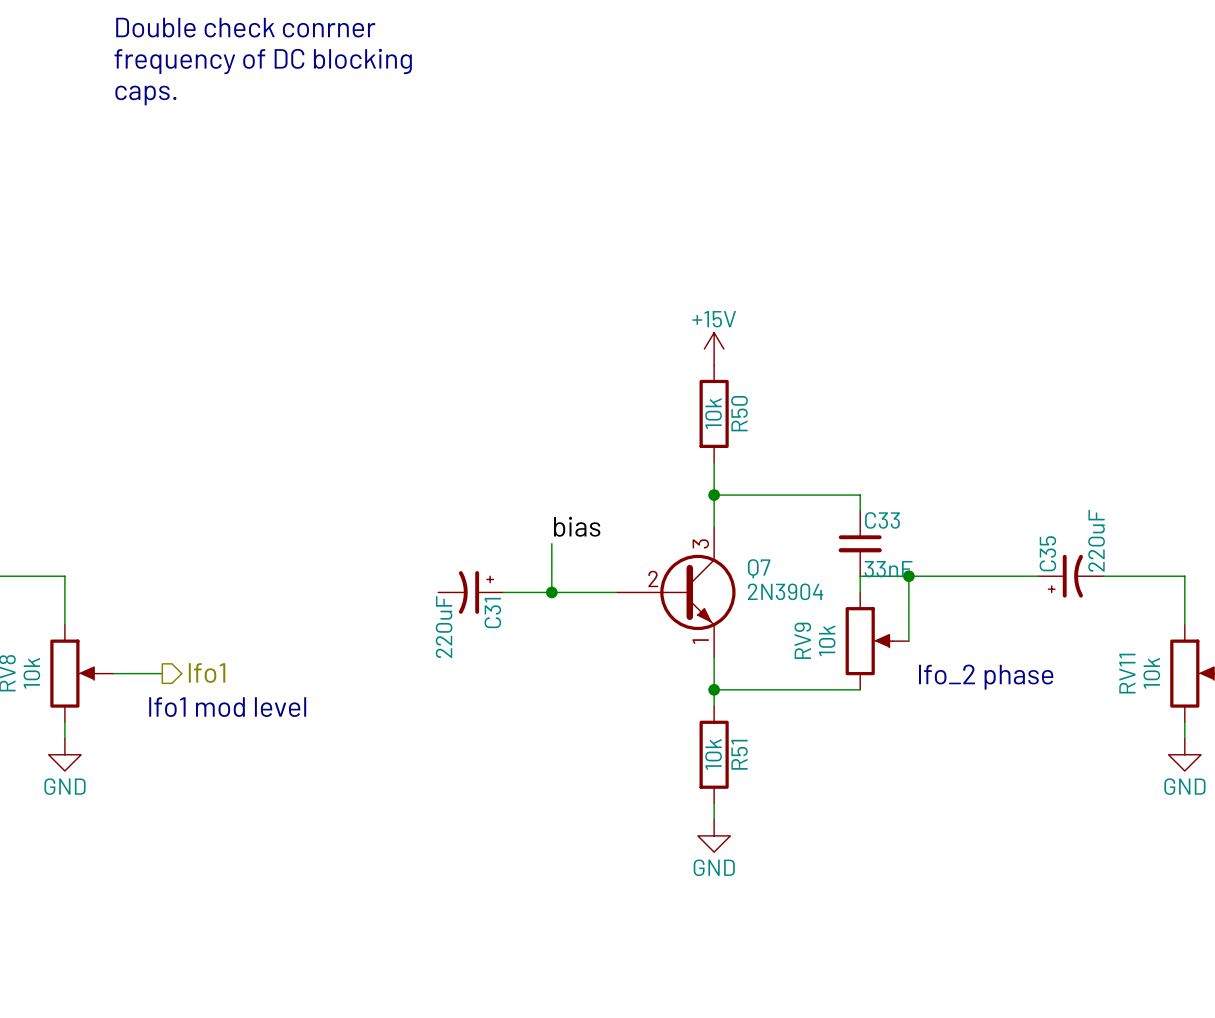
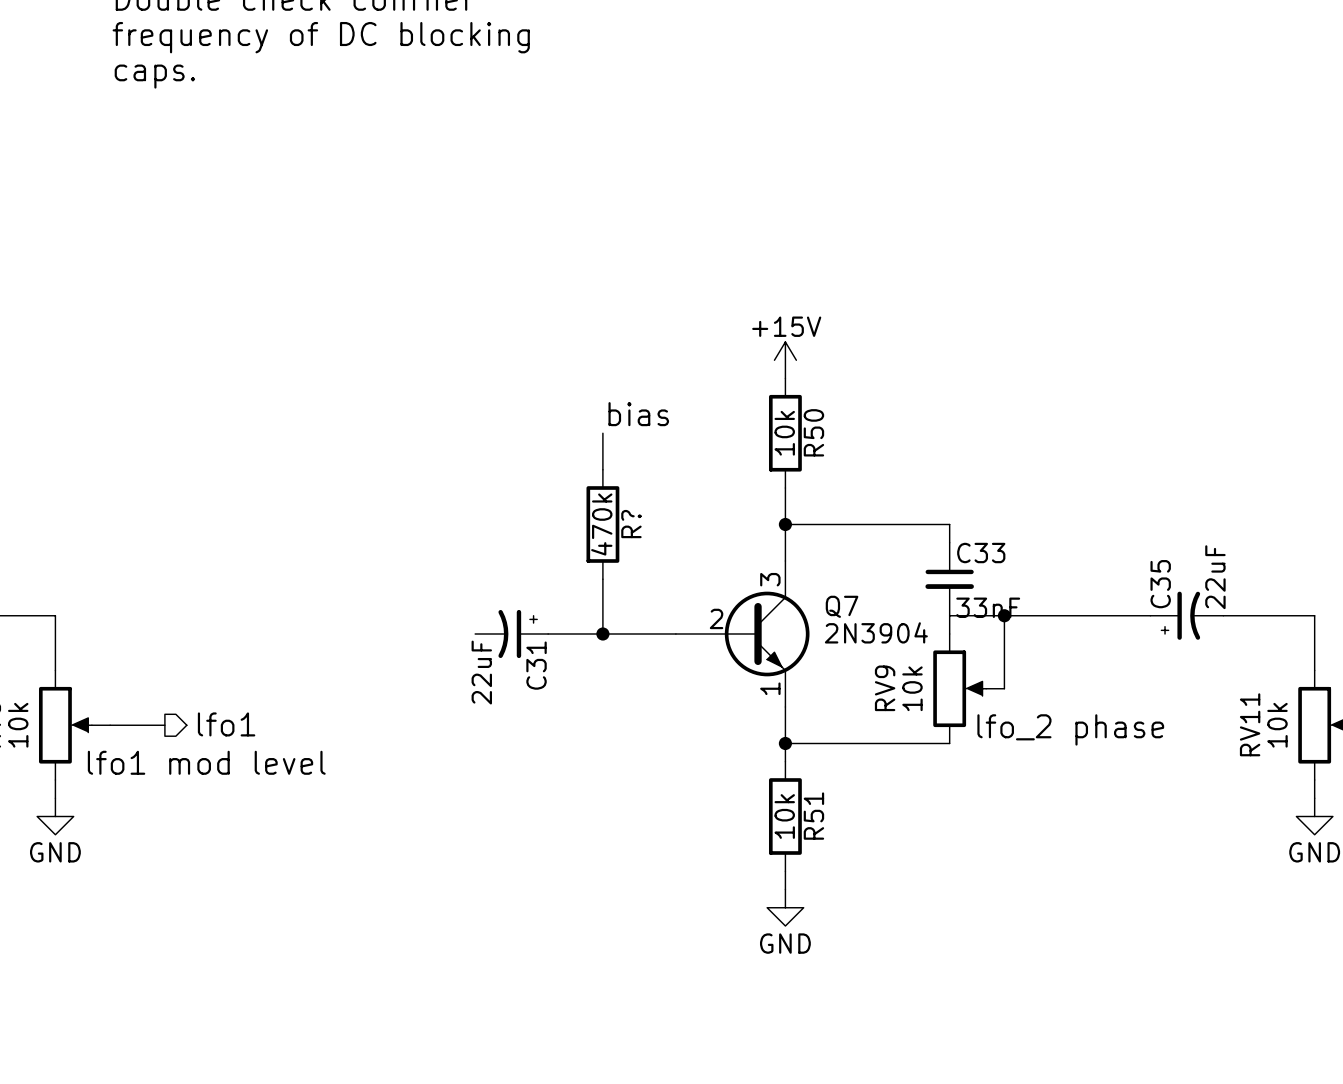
wire: none -> (602, 433) (602, 469)
R?: none -> 470k (602, 524)
label position: bias (577, 526) -> bias (638, 414)
C35 value: 220uF (1096, 540) -> 22uF (1215, 577)
C31 value: 220uF (444, 627) -> 22uF (481, 672)

